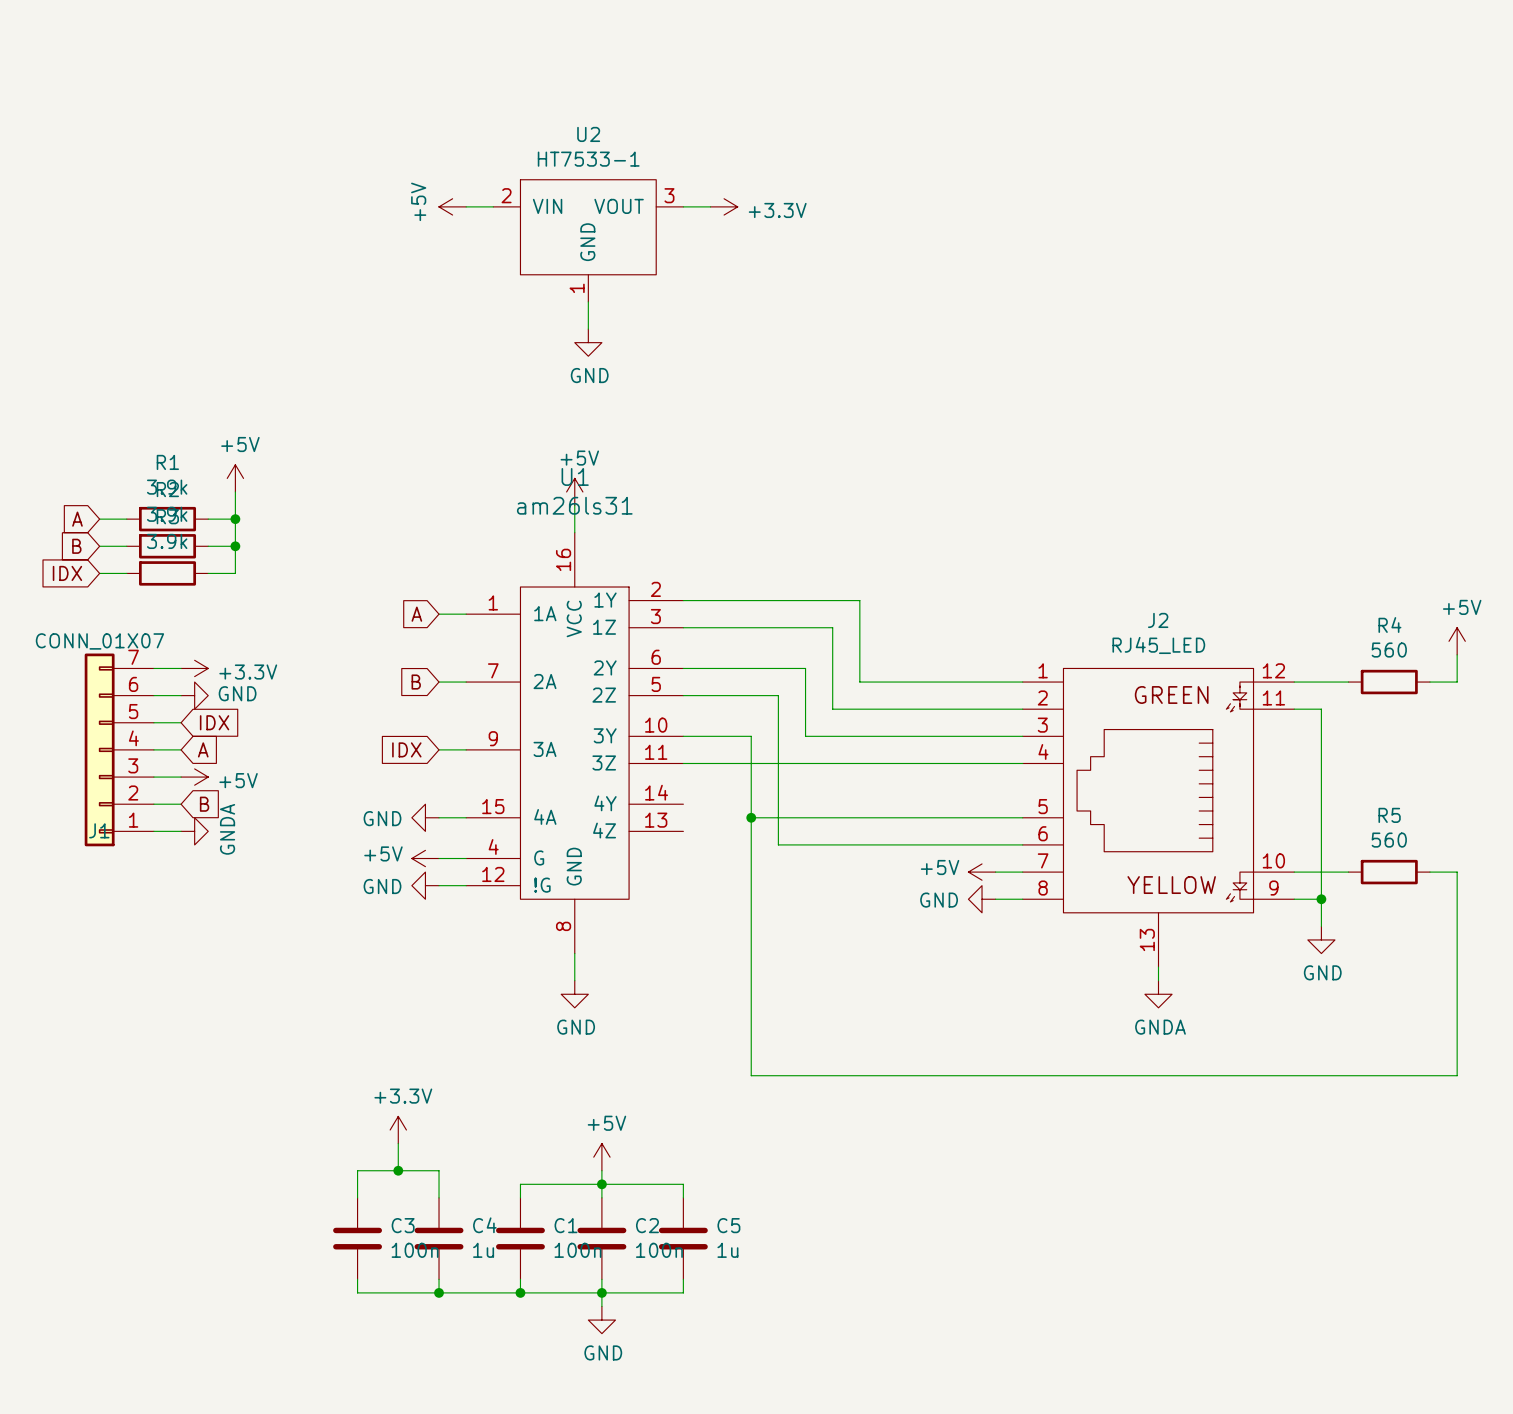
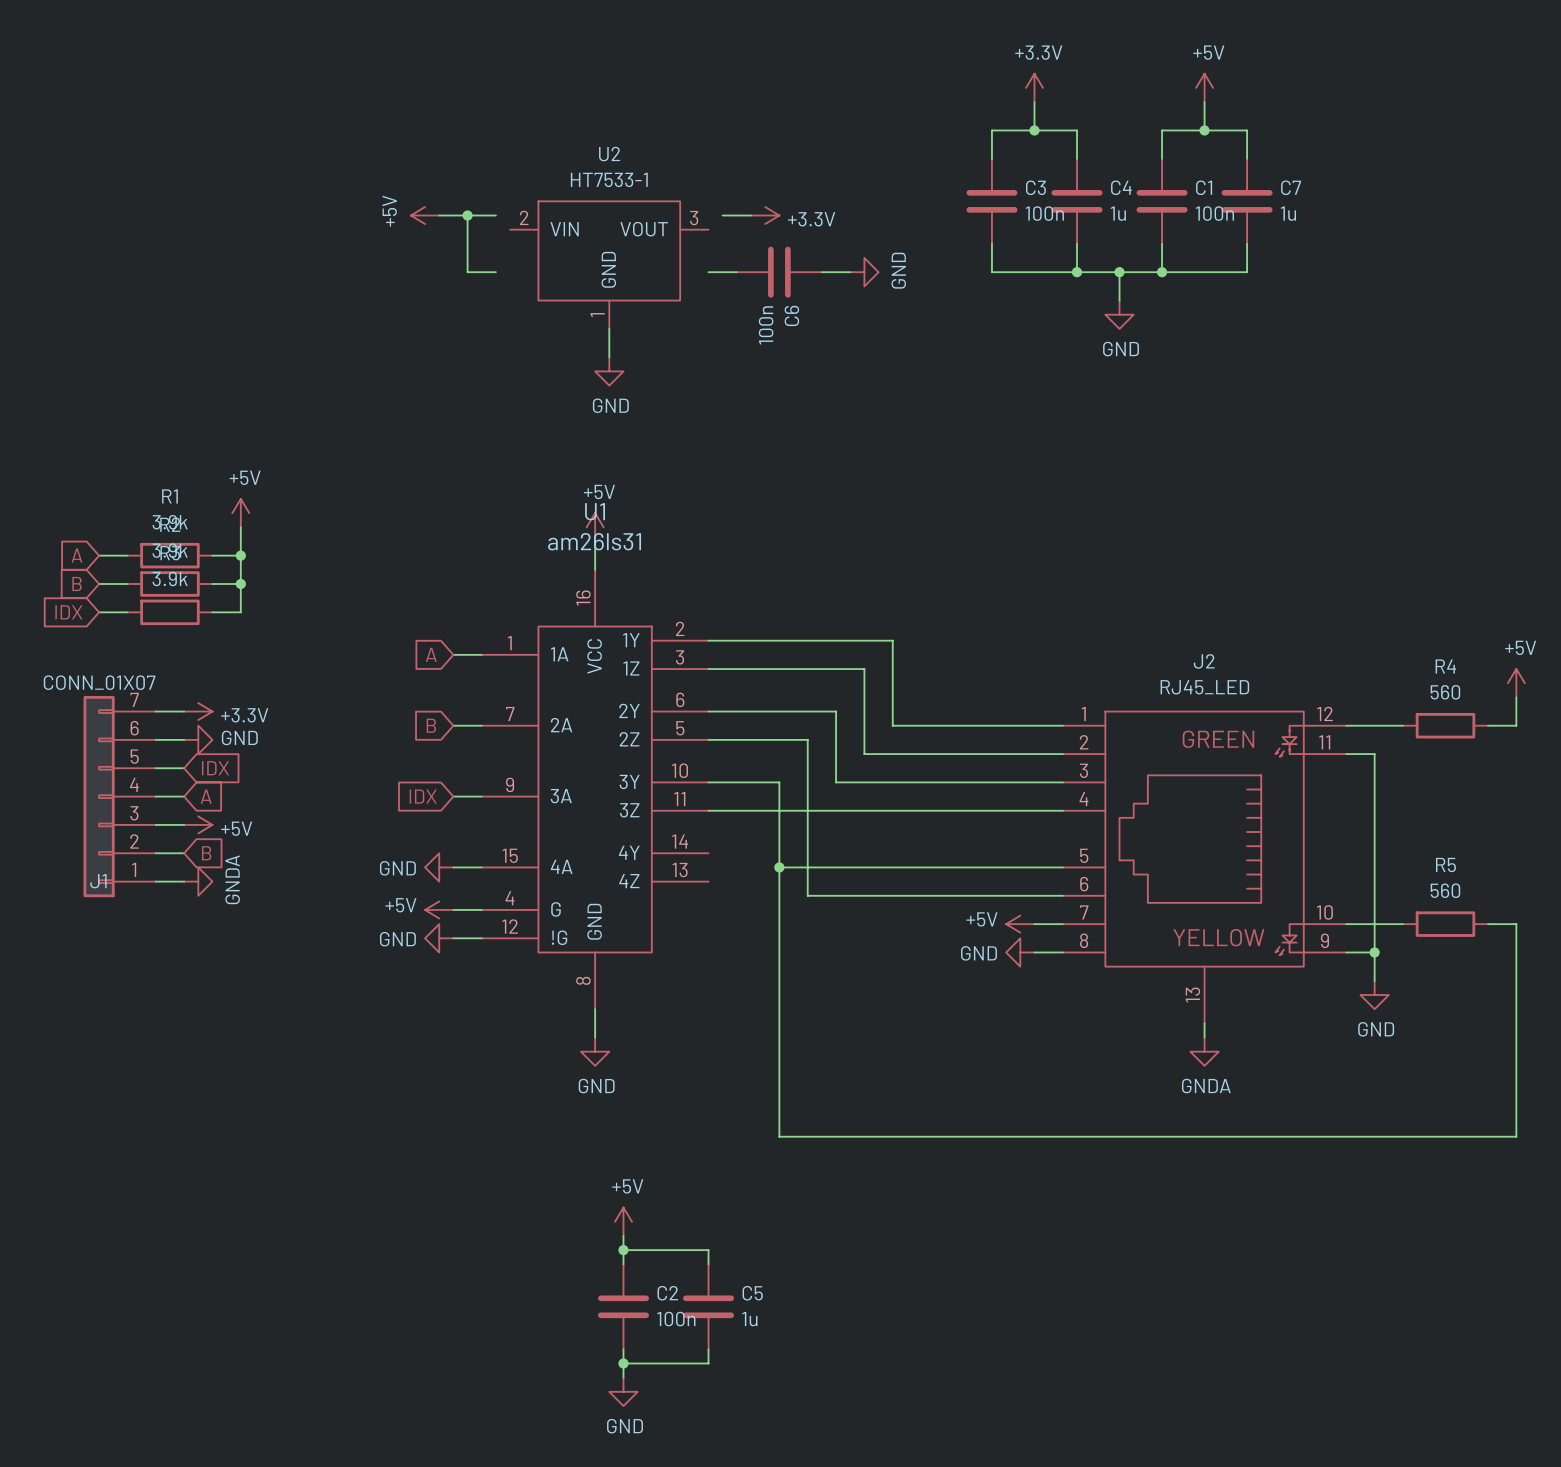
power symbol: none -> +3.3V (1034, 87)
power symbol: none -> +5V (1204, 87)
wire: none -> (1034, 102) (1034, 130)
wire: none -> (1204, 102) (1204, 130)
junction: none -> (1034, 130)
junction: none -> (1204, 130)
wire: none -> (991, 158) (991, 130) (1077, 130) (1077, 158)
wire: none -> (1162, 158) (1162, 130) (1247, 130) (1247, 158)
C7: none -> 1u (1247, 201)
wire: none -> (439, 215) (495, 215)
wire: none -> (467, 215) (467, 272) (495, 272)
junction: none -> (467, 215)
power symbol position: +5V (452, 206) -> +5V (425, 215)
wire: (466, 206) (493, 206) -> (708, 272) (736, 272)
wire: (683, 206) (710, 206) -> (722, 215) (751, 215)
power symbol position: +3.3V (724, 206) -> +3.3V (765, 215)
wire: none -> (991, 243) (991, 272) (1247, 272) (1247, 243)
wire: none -> (1077, 243) (1077, 272)
wire: none -> (1162, 243) (1162, 272)
C6: none -> 100n (779, 272)
wire: none -> (821, 272) (850, 272)
power symbol: none -> GND (864, 272)
junction: none -> (1077, 272)
wire: none -> (1119, 272) (1119, 300)
junction: none -> (1119, 272)
junction: none -> (1162, 272)
power symbol: none -> GND (1119, 314)
power symbol: +3.3V (398, 1130) -> none
wire: (398, 1143) (398, 1170) -> none
junction: (398, 1170) -> none
wire: (601, 1184) (520, 1184) (520, 1197) -> none
wire: (357, 1197) (357, 1170) (439, 1170) (439, 1197) -> none
C3 position: (357, 1238) -> (991, 201)
C4 position: (439, 1238) -> (1077, 201)
C1 position: (520, 1238) -> (1162, 201)
wire: (357, 1279) (357, 1292) (601, 1292) -> none
wire: (439, 1279) (439, 1292) -> none
wire: (520, 1279) (520, 1292) -> none
junction: (439, 1292) -> none
junction: (520, 1292) -> none

